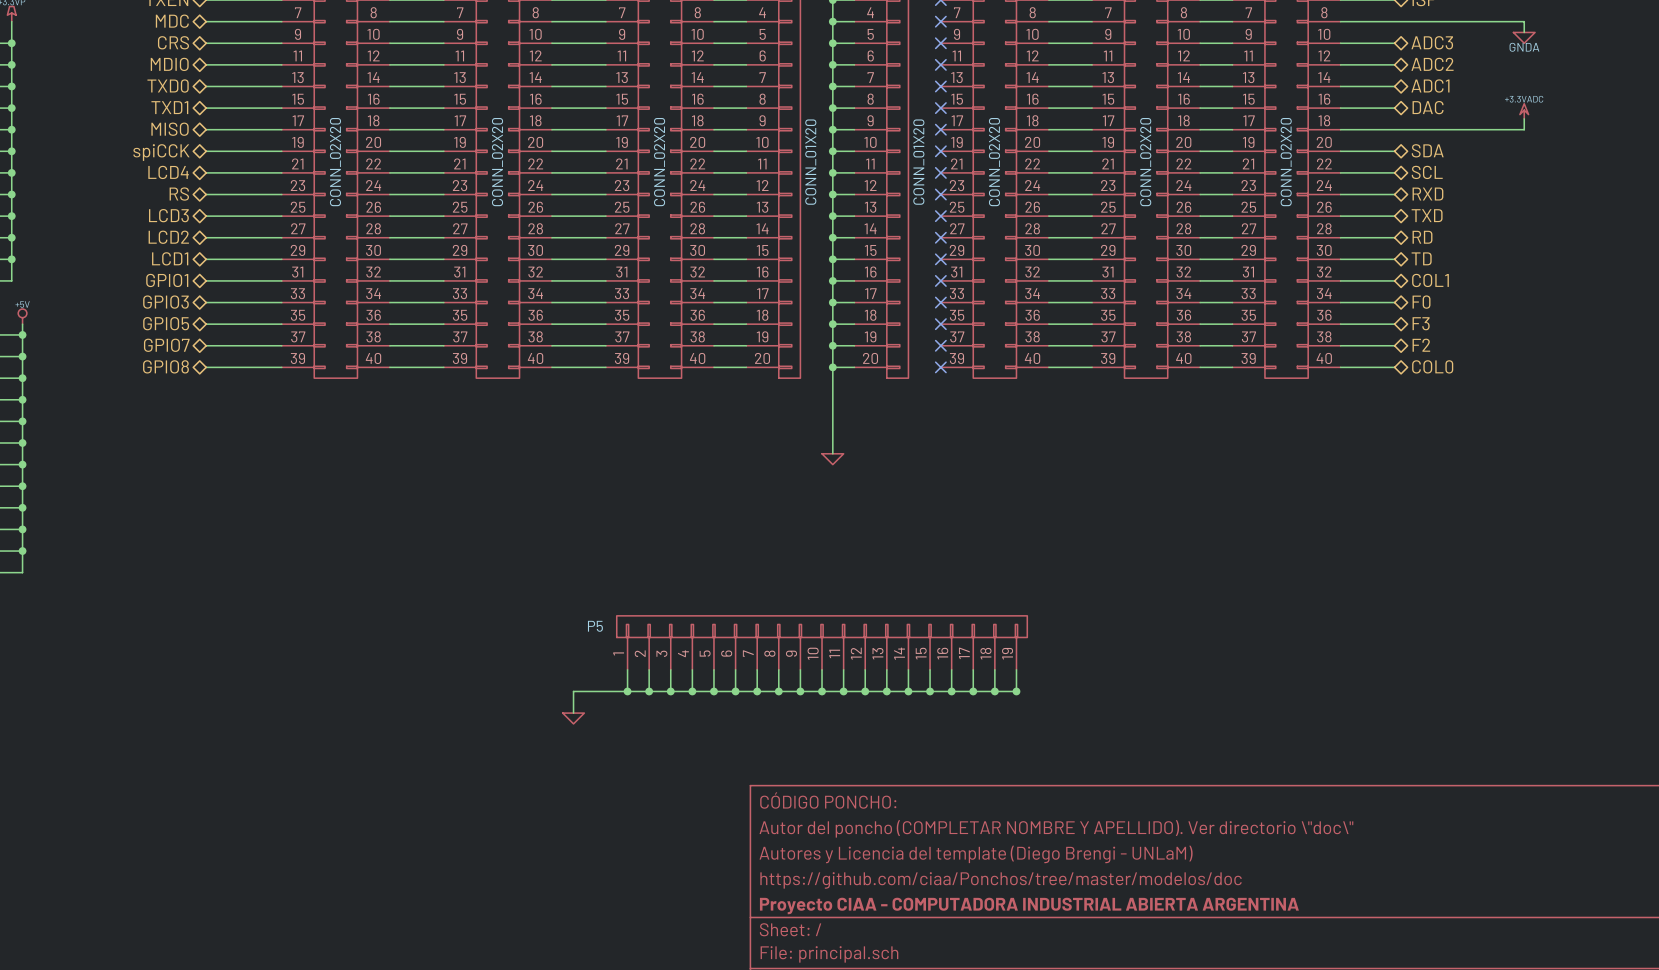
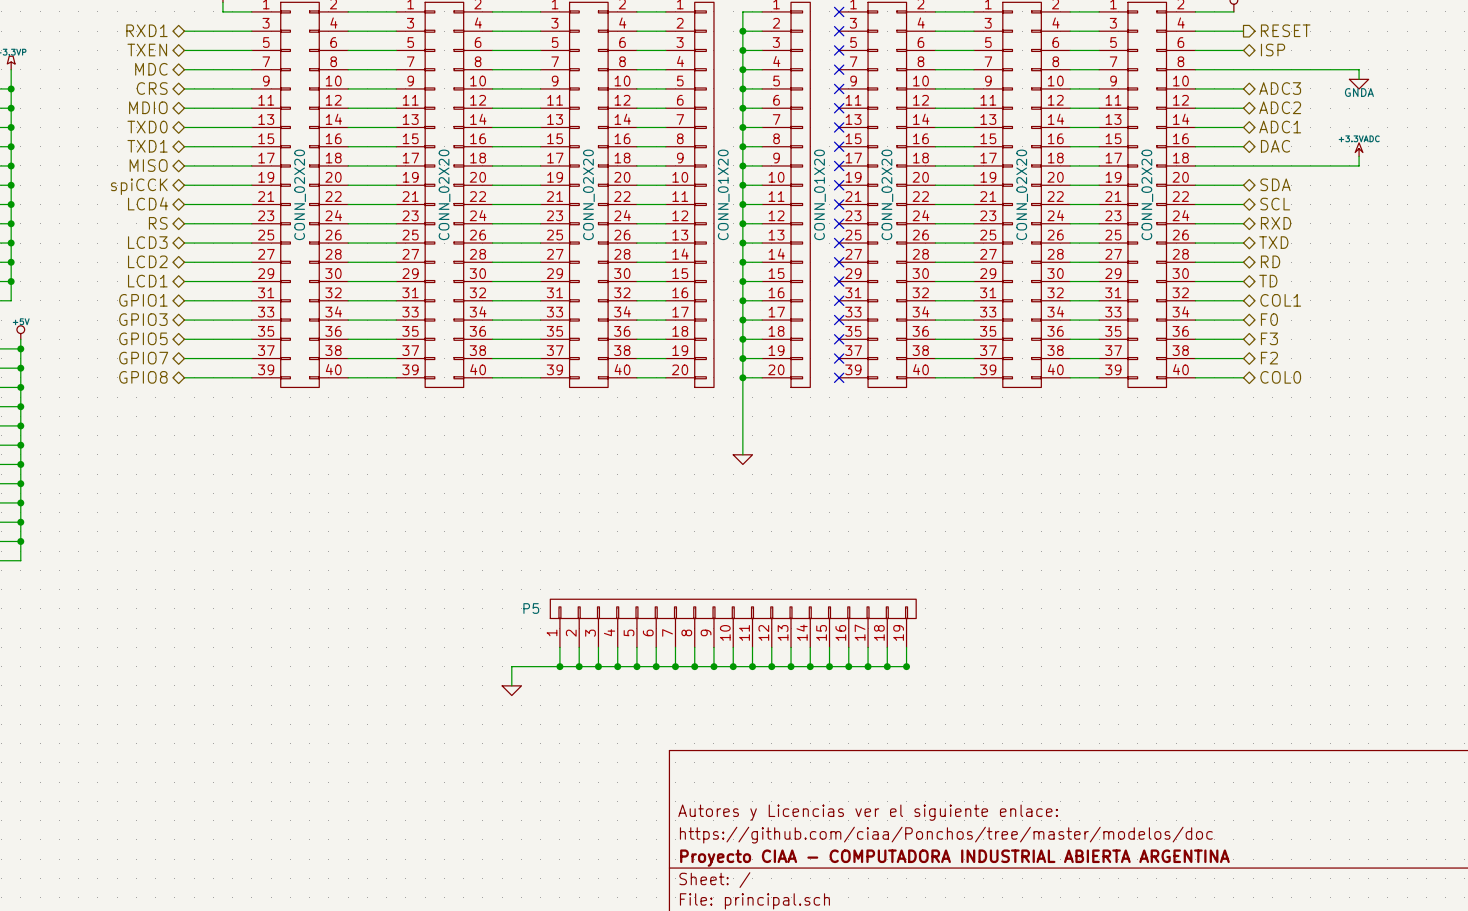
title block: CÓDIGO PONCHO: (828, 800) -> none
title block: Autor del poncho (COMPLETAR NOMBRE Y APELLIDO). Ver directorio \"doc\" (1056, 828) -> none
title block: Autores y Licencia del template (Diego Brengi - UNLaM) (976, 854) -> Autores y Licencias ver el siguiente enlace: (868, 812)

